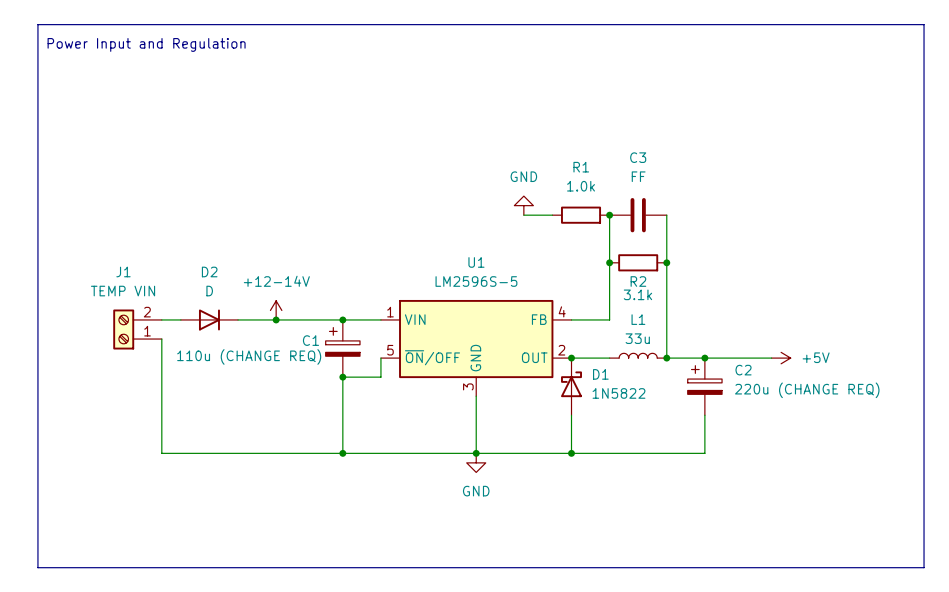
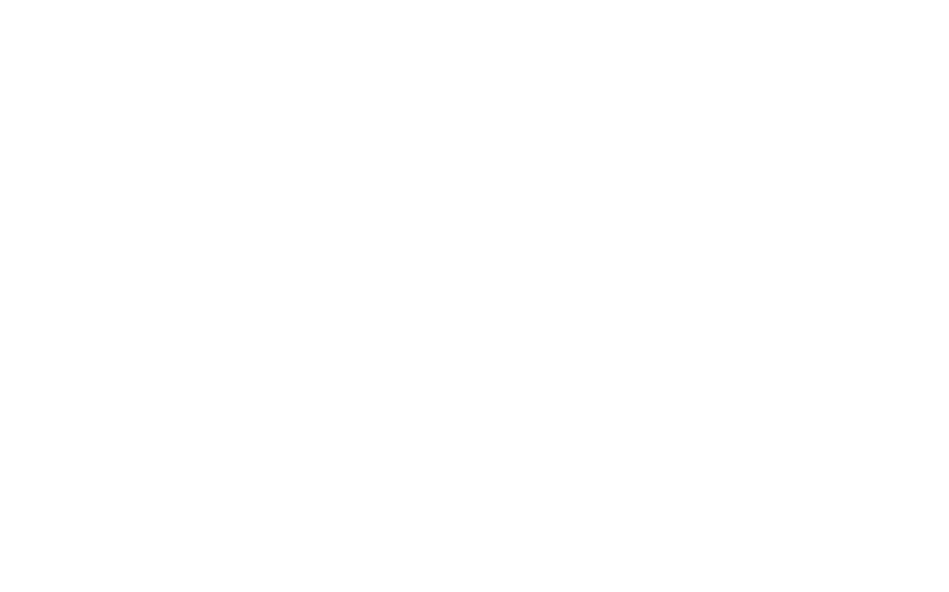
line: (37, 24) (924, 24) (924, 567) (37, 567) (37, 24) -> none
text: Power Input and Regulation (146, 44) -> none
power symbol: GND (523, 205) -> none
wire: (523, 215) (552, 215) -> none
R1: 1.0k (581, 215) -> none
wire: (609, 215) (609, 319) (571, 319) -> none
junction: (609, 215) -> none
C3: FF (638, 215) -> none
wire: (666, 215) (666, 358) (771, 358) -> none
junction: (609, 262) -> none
R2: 3.1k (638, 262) -> none
junction: (666, 262) -> none
power symbol: +12-14V (276, 310) -> none
wire: (161, 319) (180, 319) -> none
D2: D (209, 319) -> none
wire: (238, 319) (380, 319) -> none
junction: (276, 319) -> none
junction: (342, 319) -> none
J1: TEMP VIN (137, 329) -> none
wire: (161, 339) (161, 453) (704, 453) (704, 415) -> none
C1: 110u (CHANGE REQ) (342, 348) -> none
U1: LM2596S-5 (476, 348) -> none
L1: 33u (638, 355) -> none
wire: (380, 358) (380, 377) (342, 377) (342, 453) -> none
wire: (571, 358) (609, 358) -> none
junction: (571, 358) -> none
junction: (666, 358) -> none
junction: (704, 358) -> none
power symbol: +5V (781, 358) -> none
junction: (342, 377) -> none
D1: 1N5822 (571, 386) -> none
C2: 220u (CHANGE REQ) (704, 386) -> none
wire: (476, 396) (476, 453) -> none
wire: (571, 415) (571, 453) -> none
junction: (342, 453) -> none
junction: (476, 453) -> none
junction: (571, 453) -> none
power symbol: GND (476, 462) -> none

